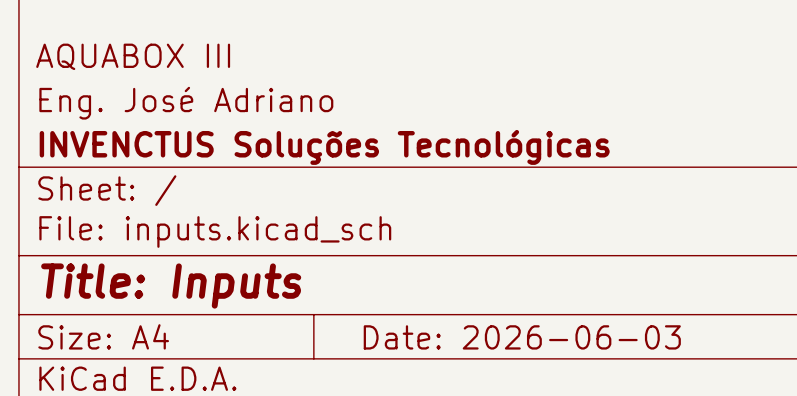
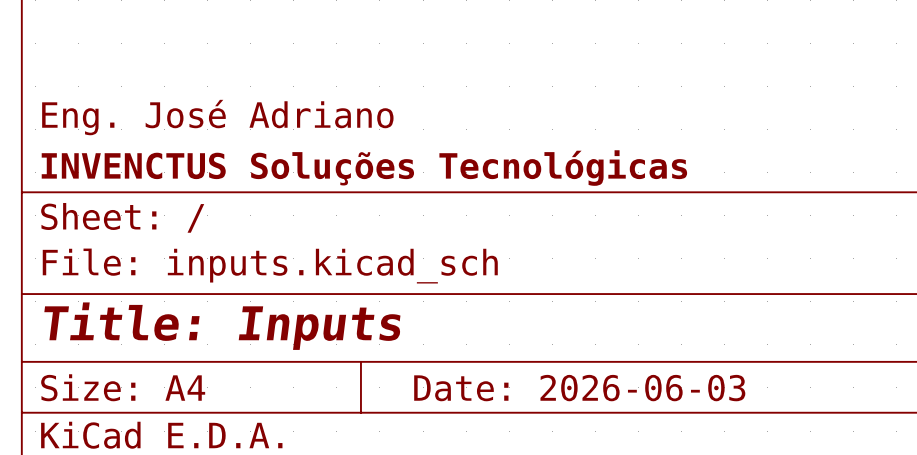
title block: AQUABOX III (133, 56) -> none

